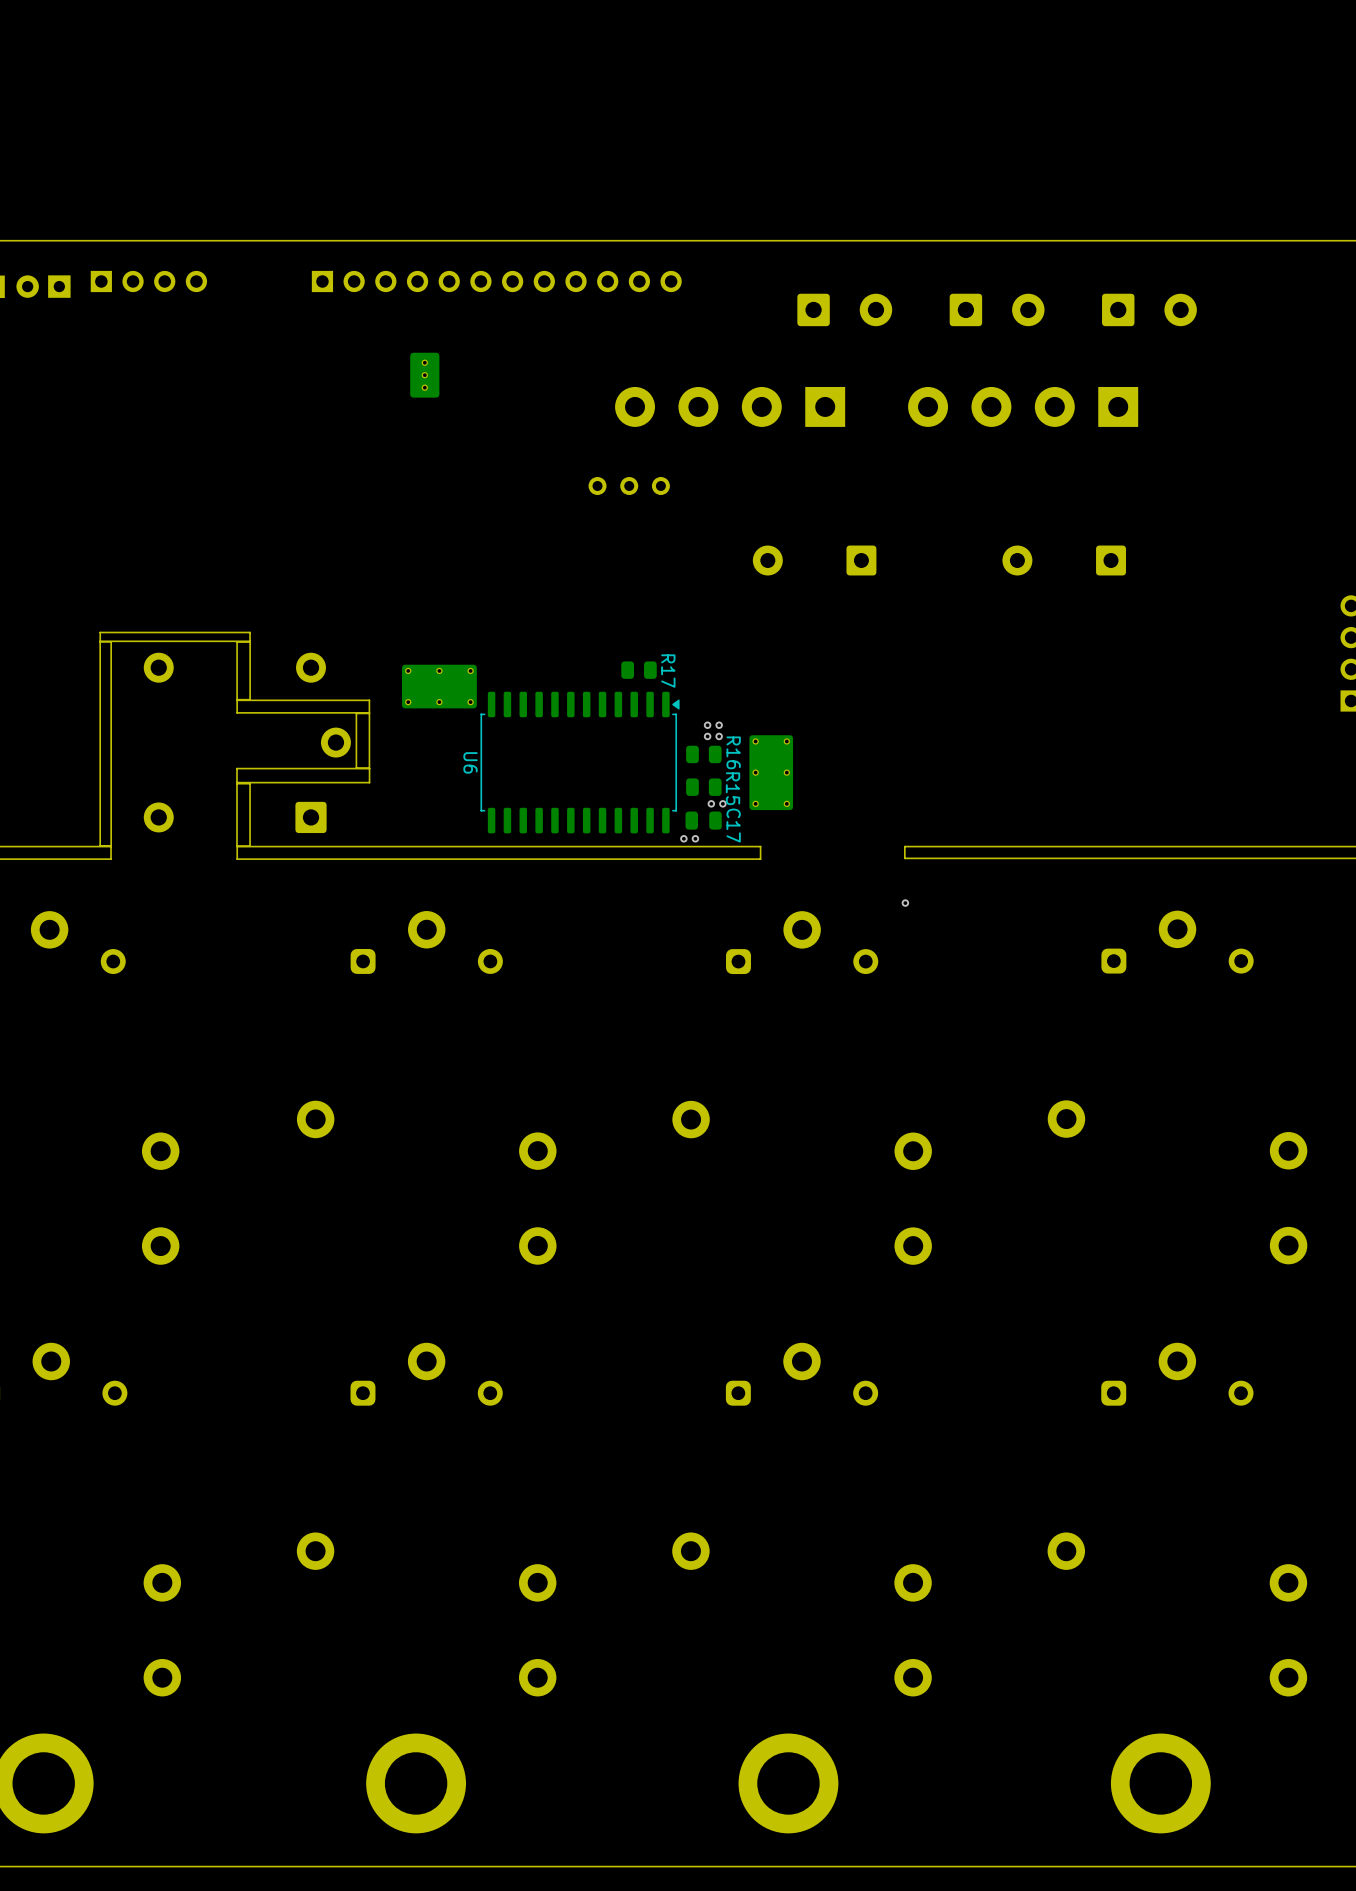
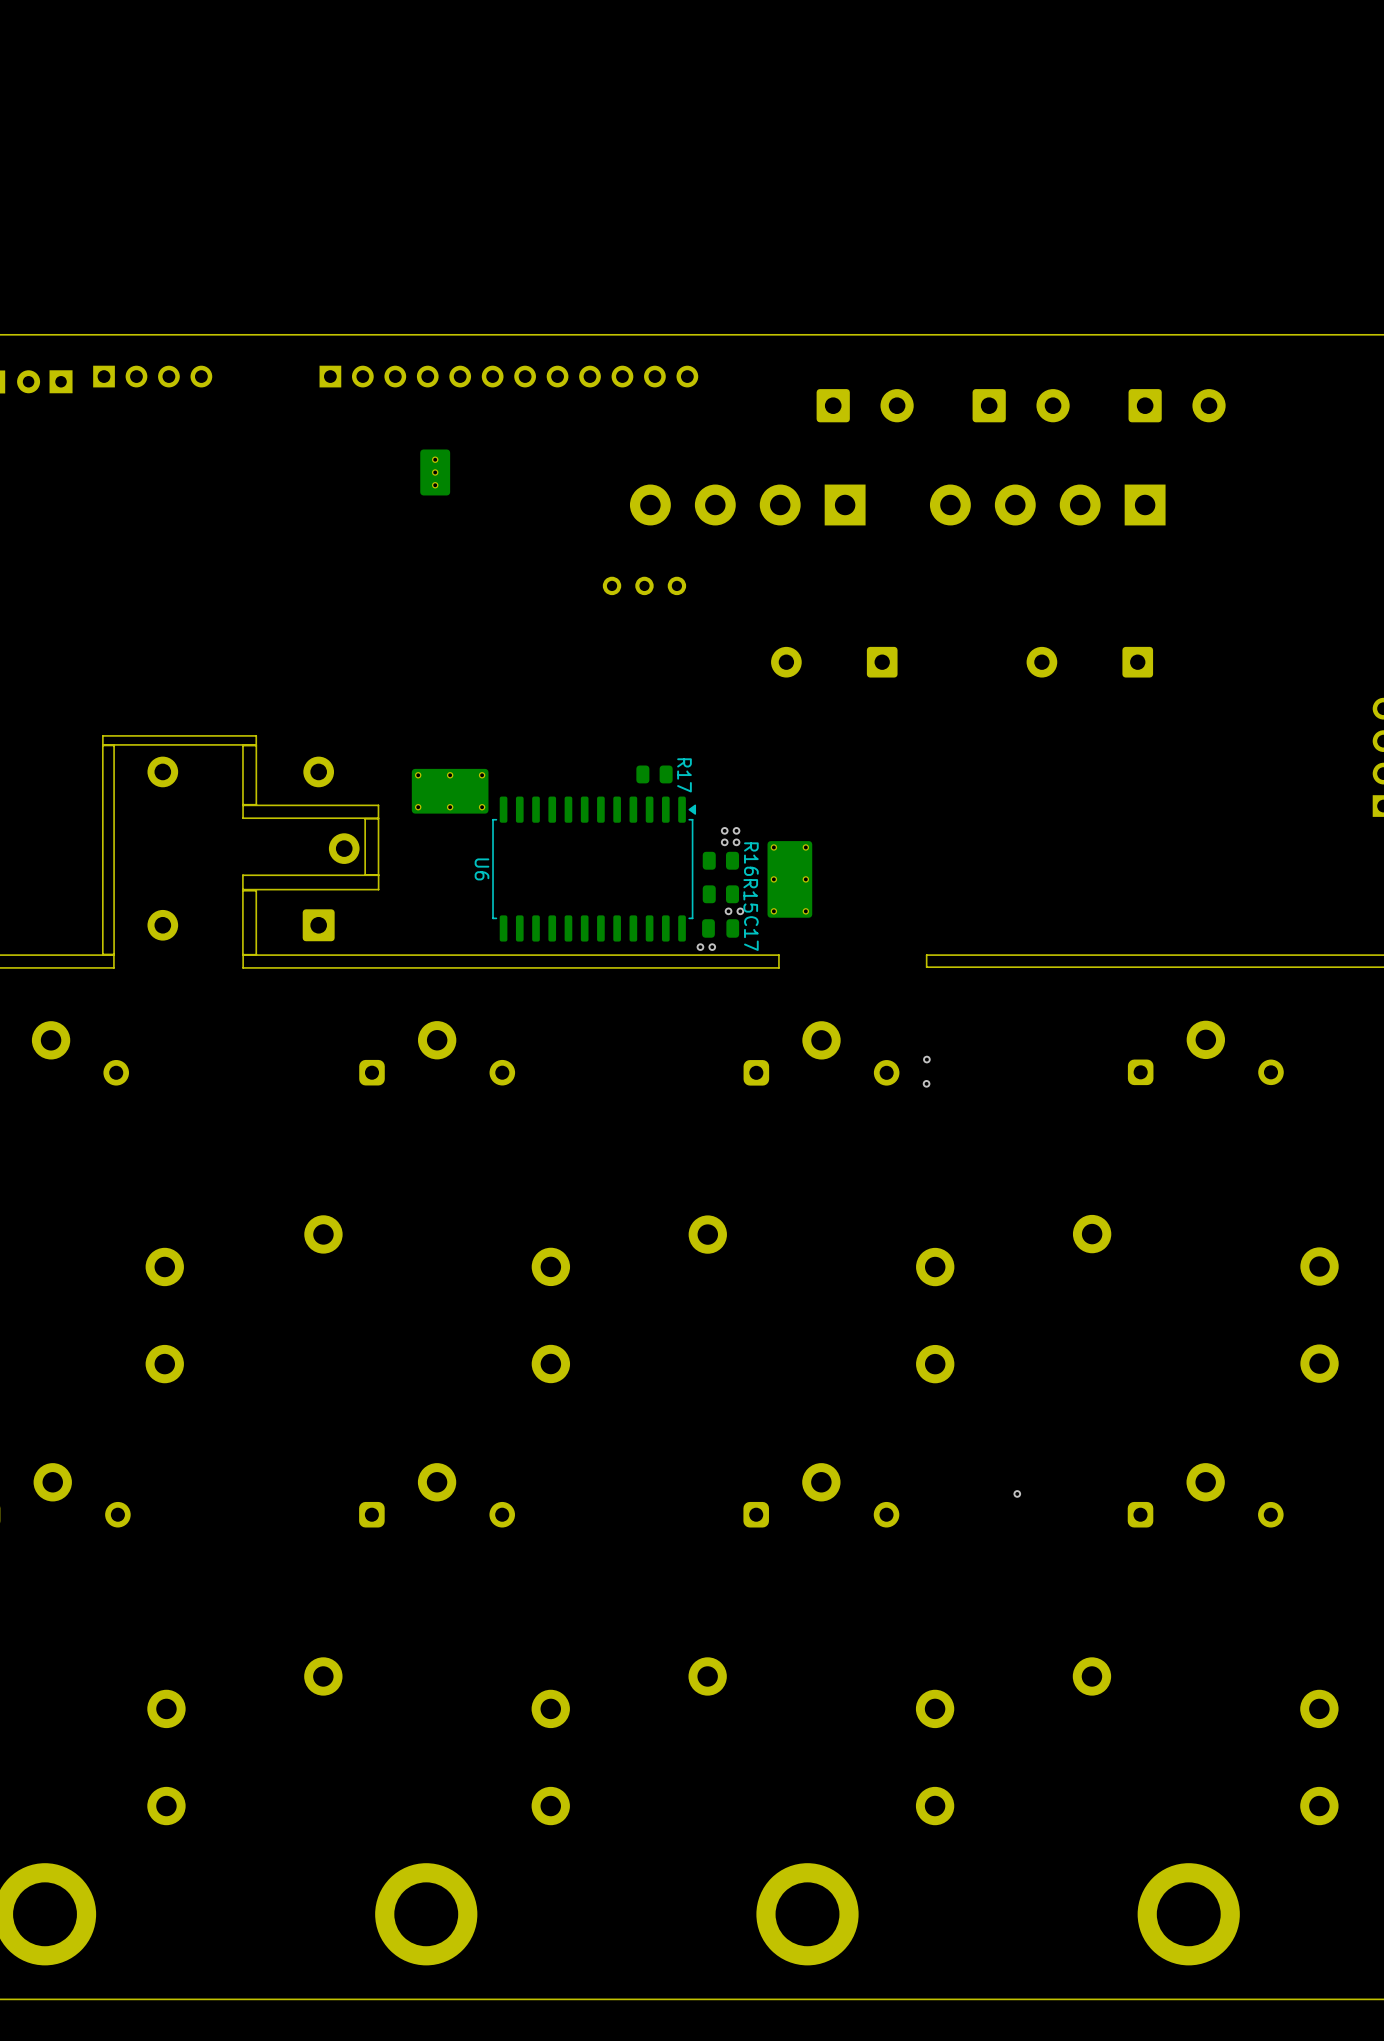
via: (905, 903) -> none
via: none -> (926, 1059)
via: none -> (926, 1083)
via: none -> (1017, 1493)

